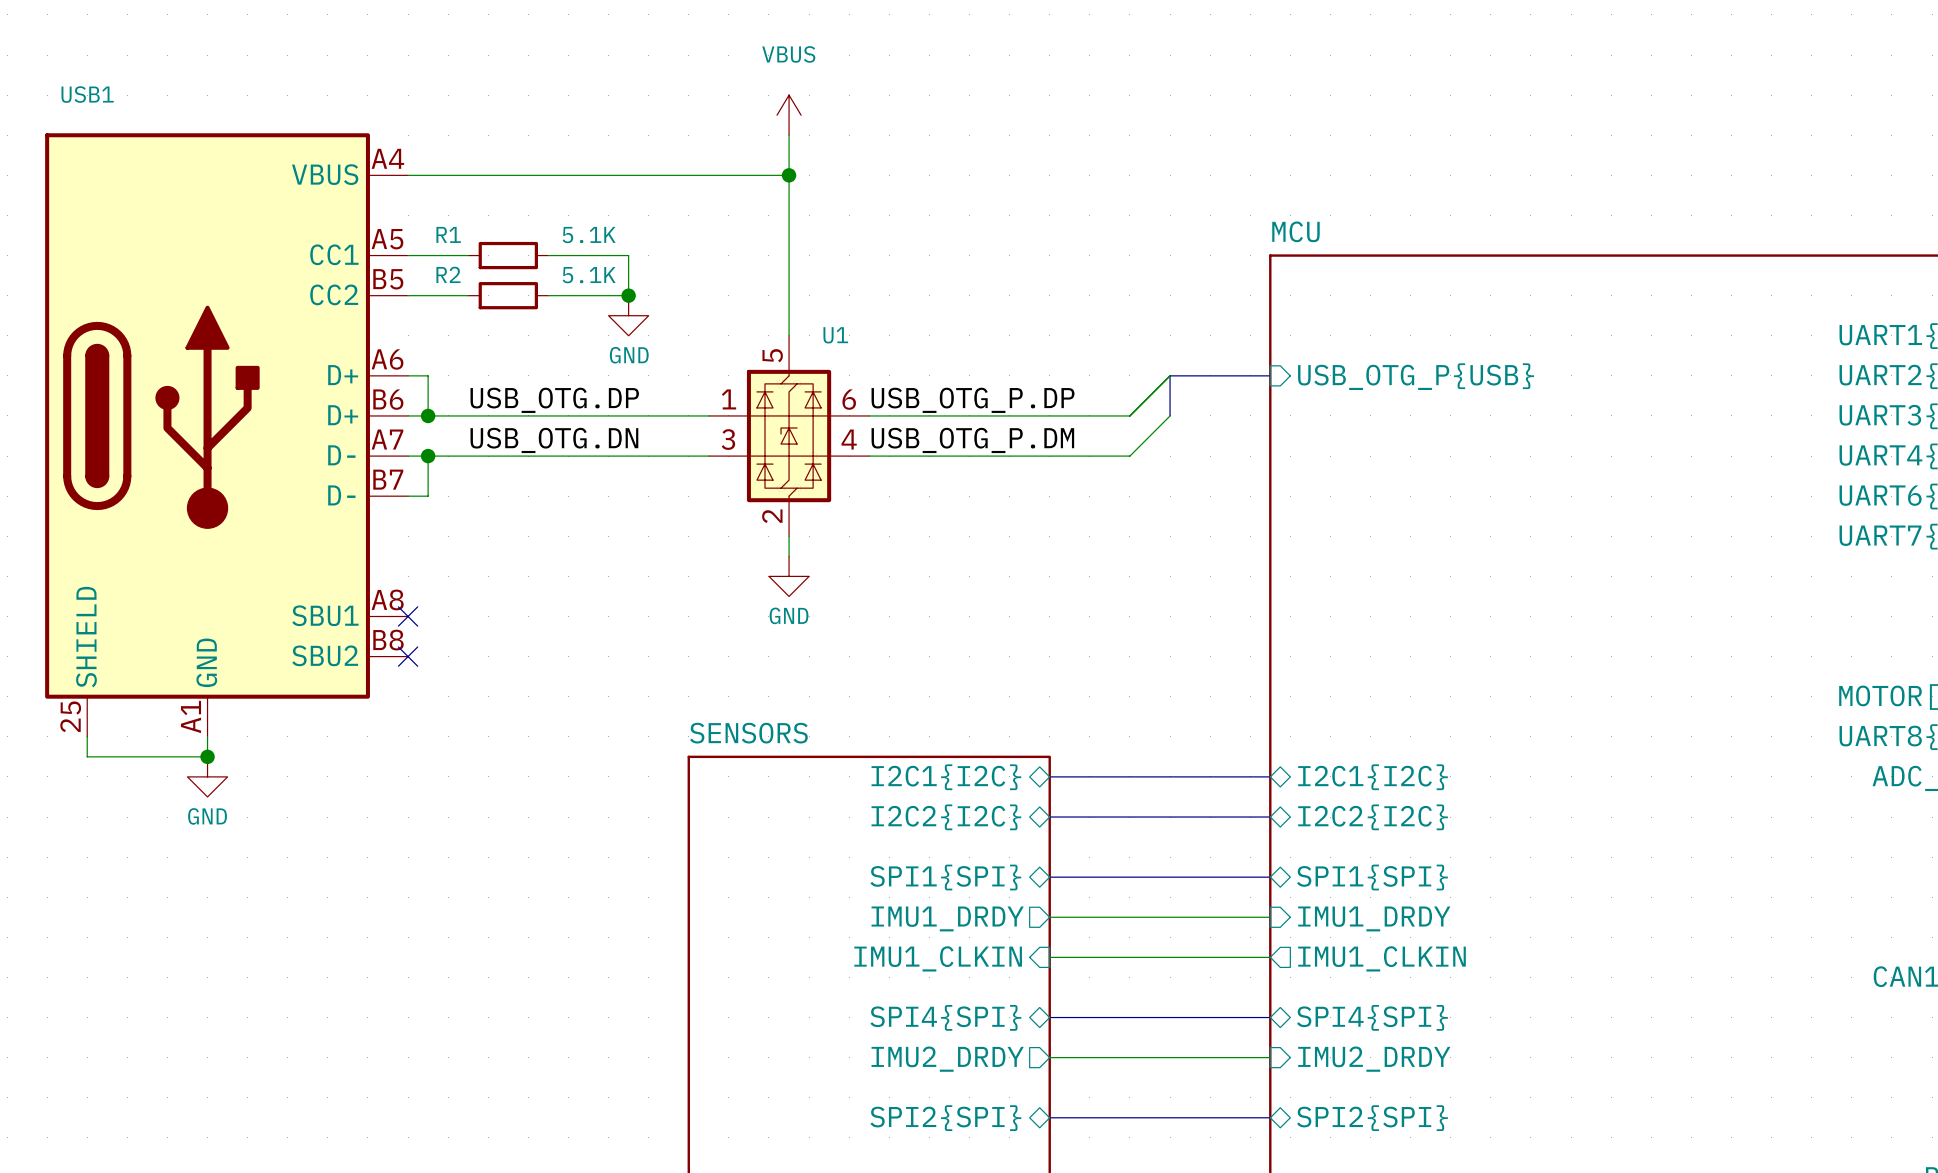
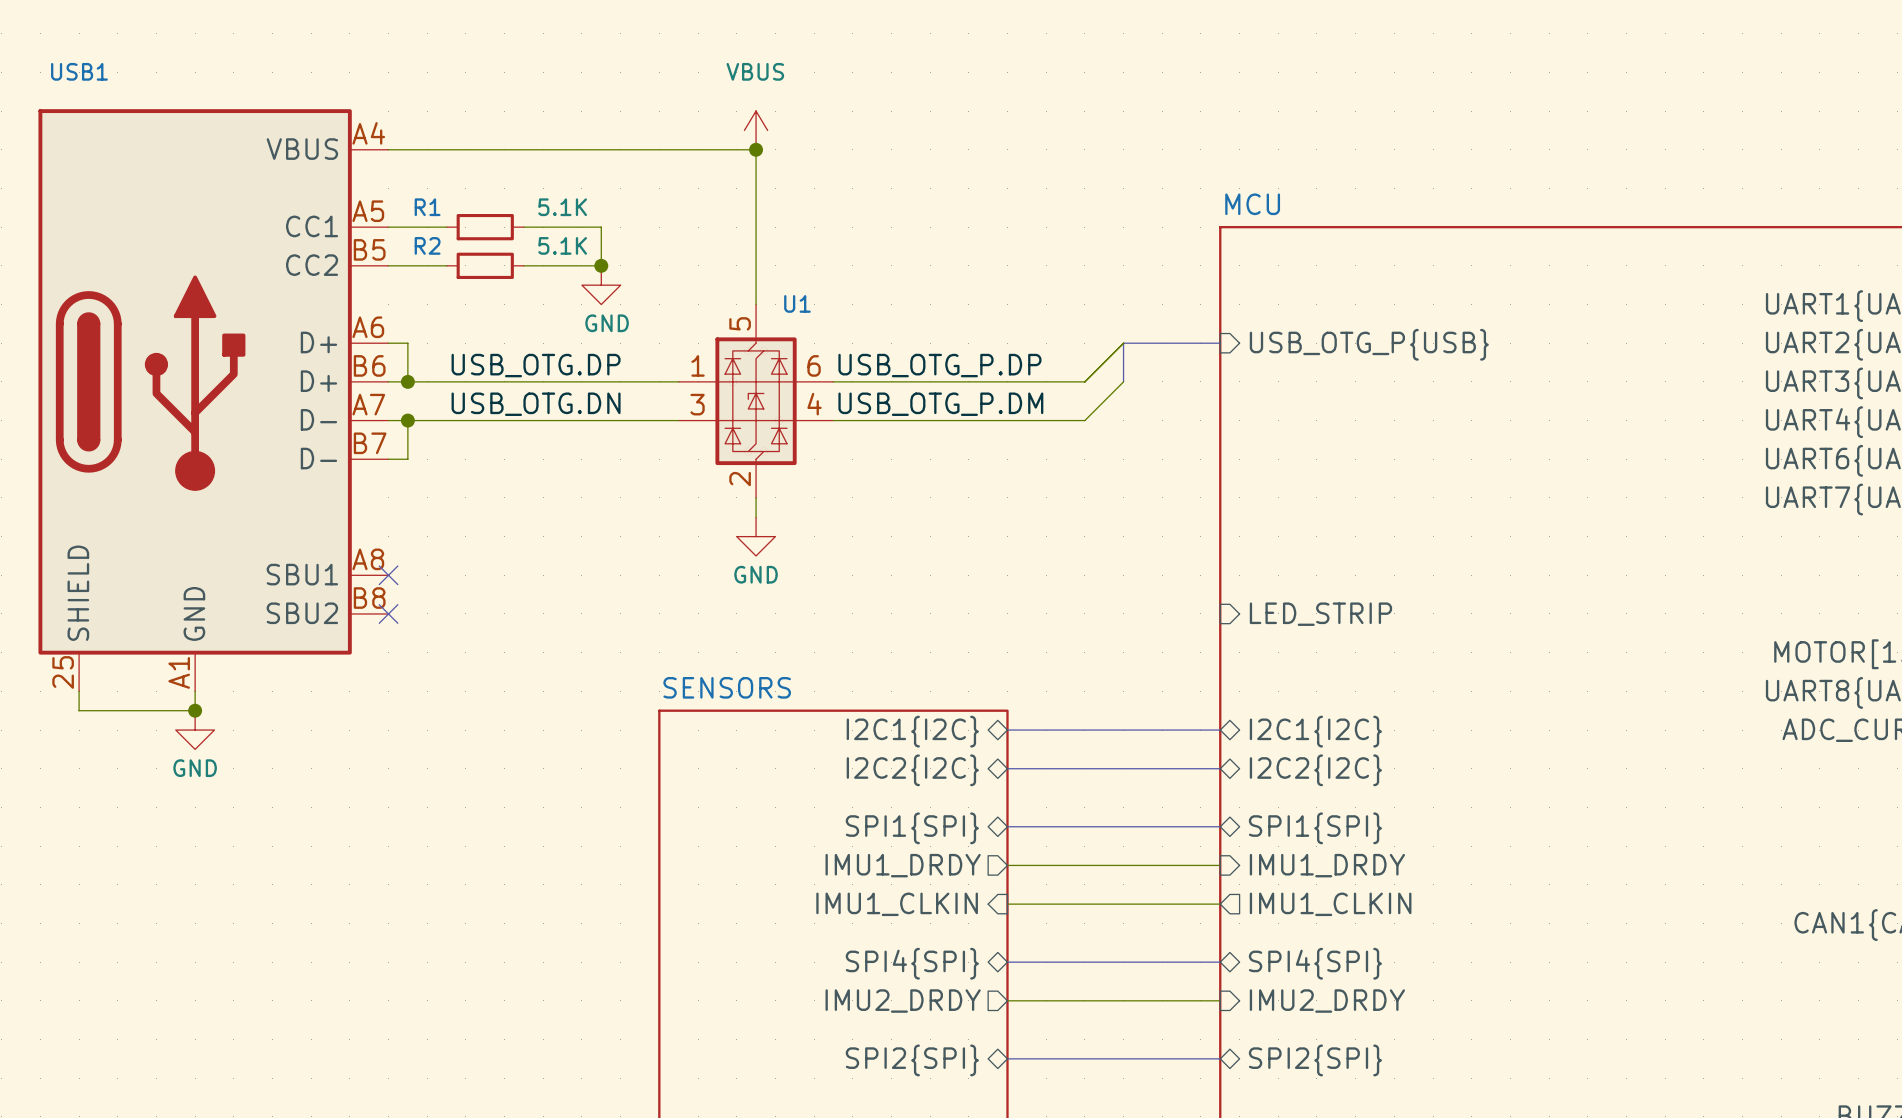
power symbol position: VBUS (789, 115) -> VBUS (756, 130)
sheet pin: none -> LED_STRIP (1320, 614)

